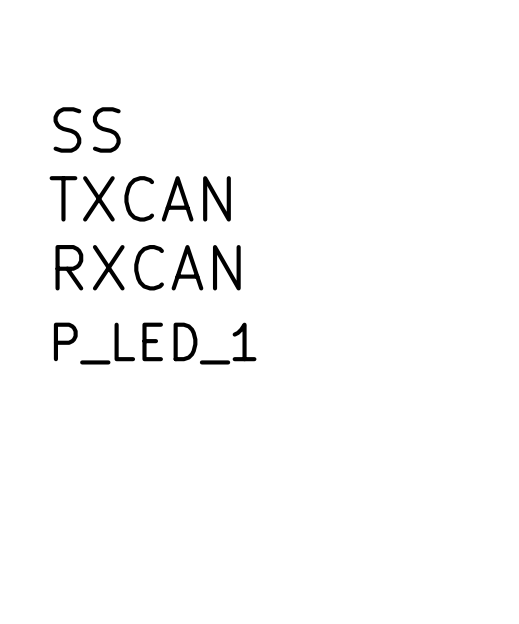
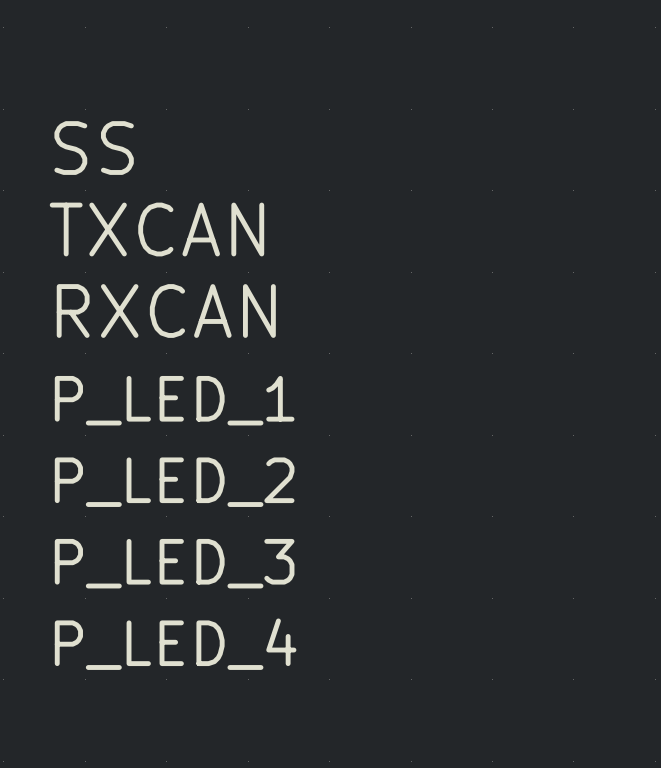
label: none -> P_LED_2 (174, 482)
label: none -> P_LED_3 (174, 563)
label: none -> P_LED_4 (175, 644)

